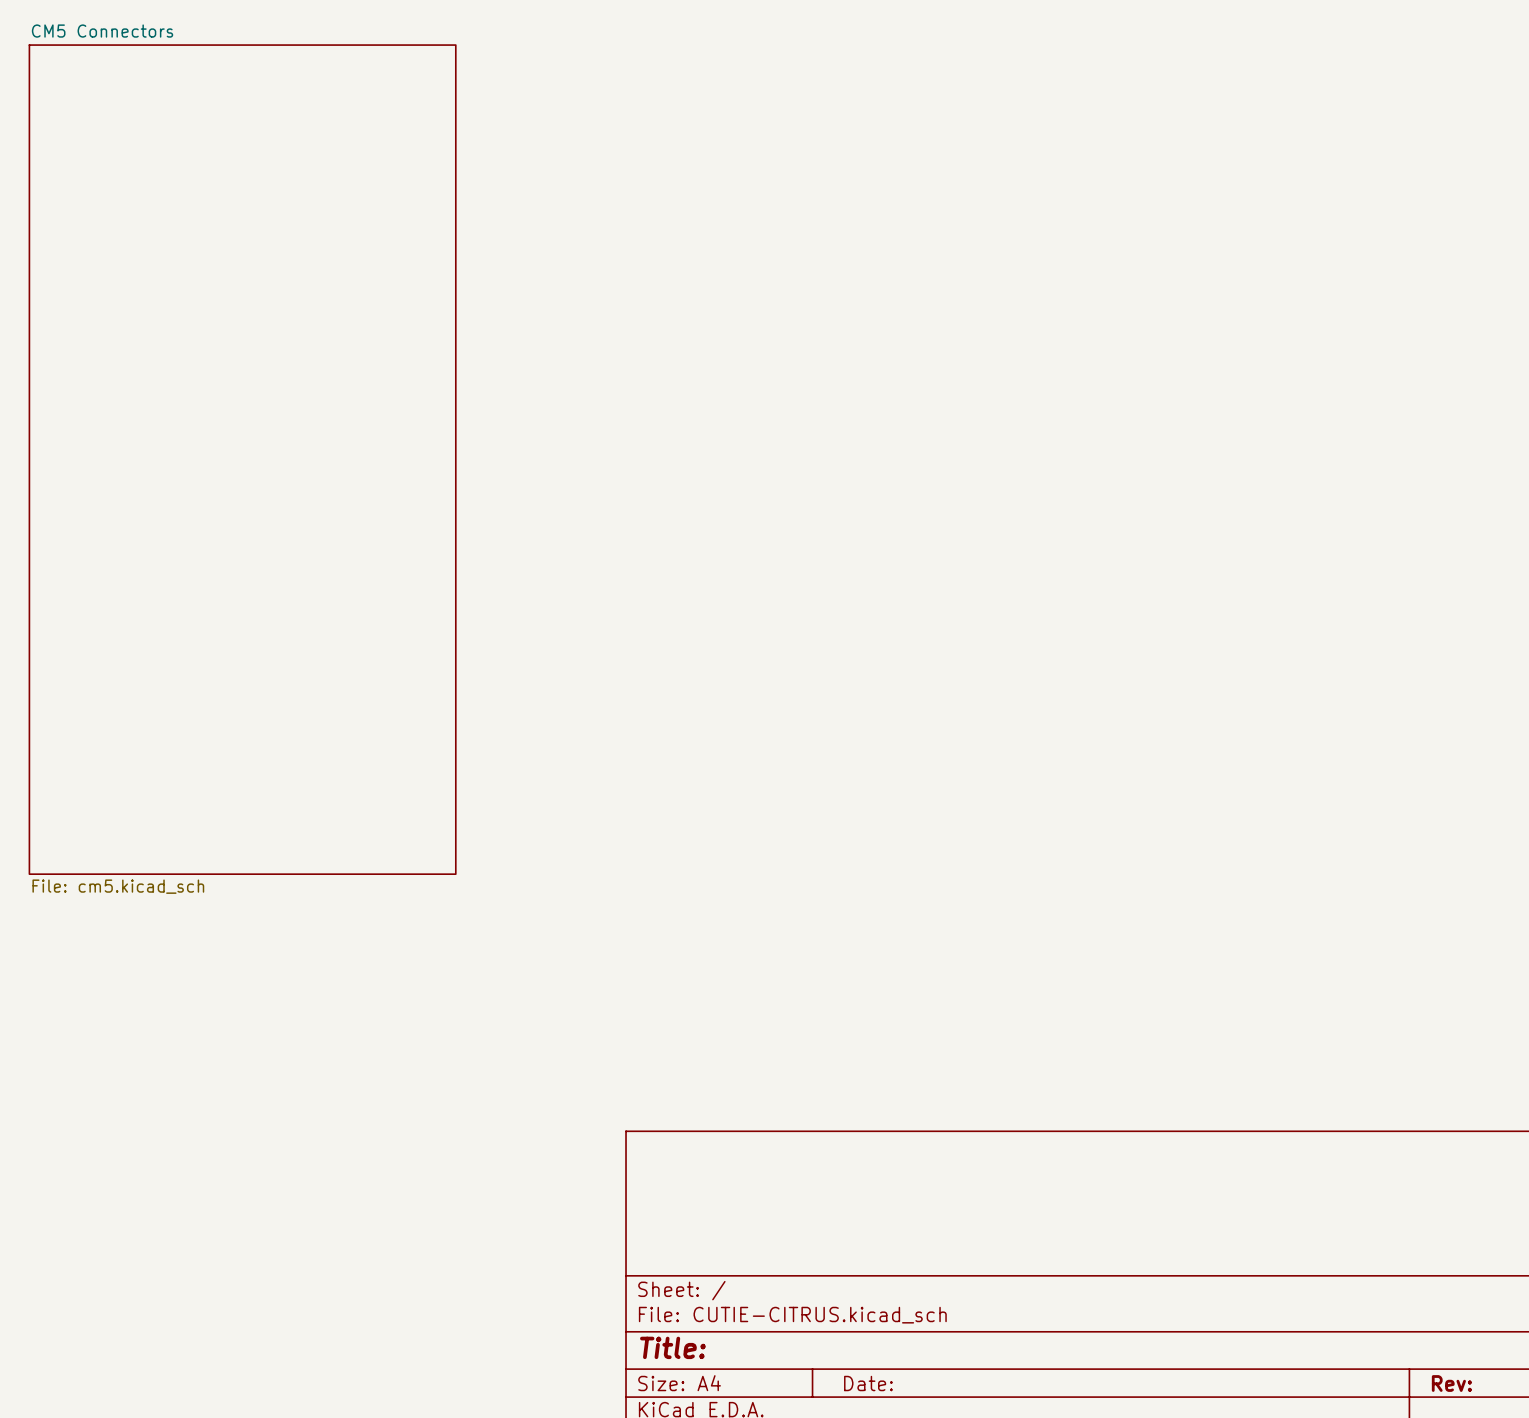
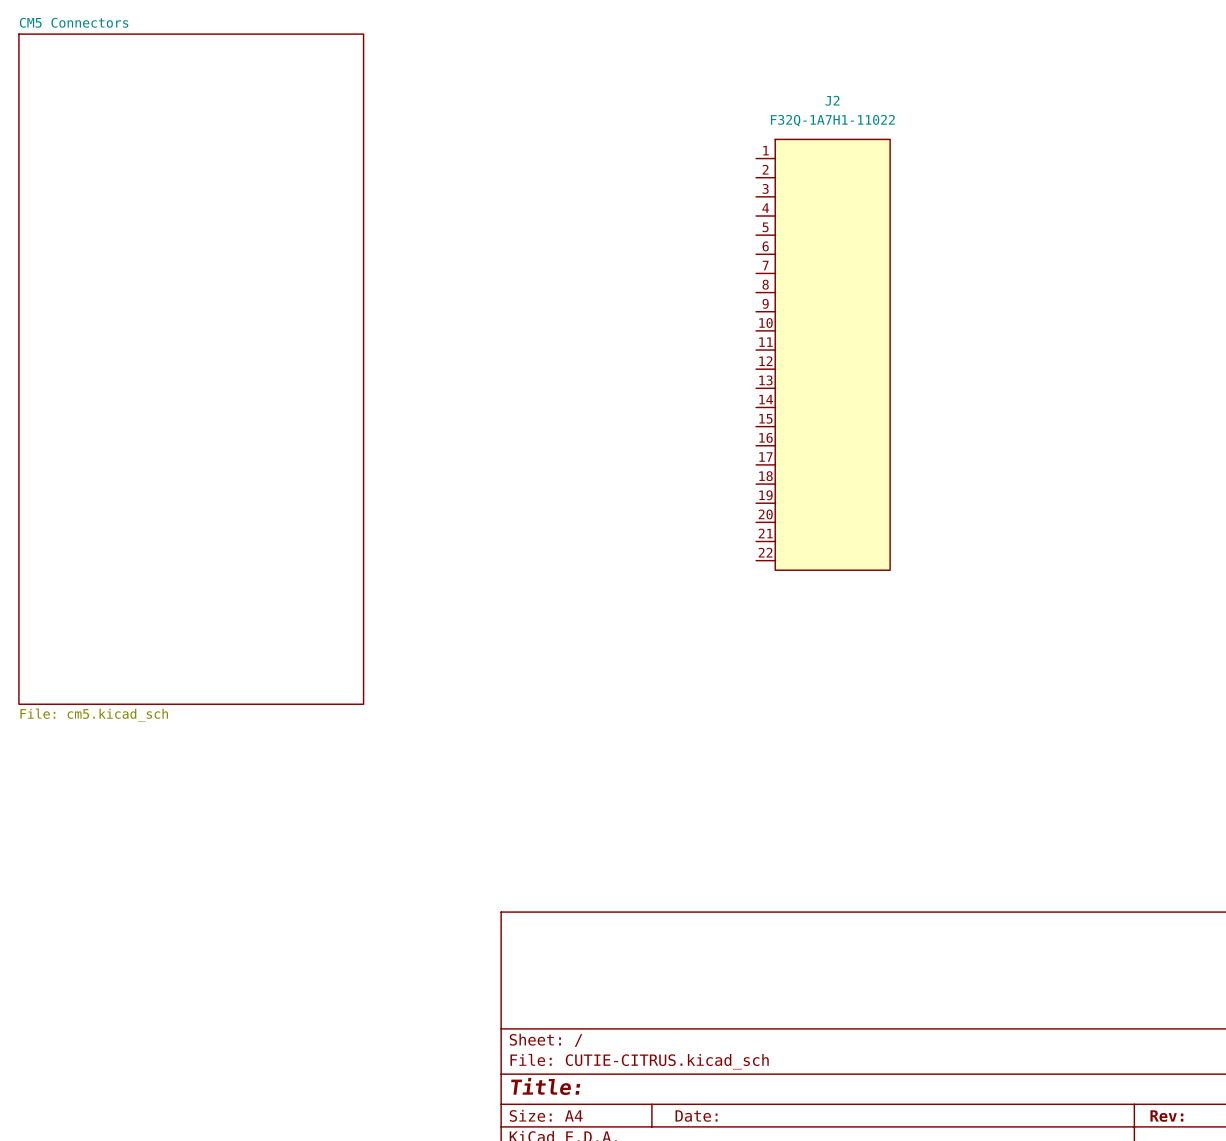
J2: none -> F32Q-1A7H1-11022 (823, 354)

